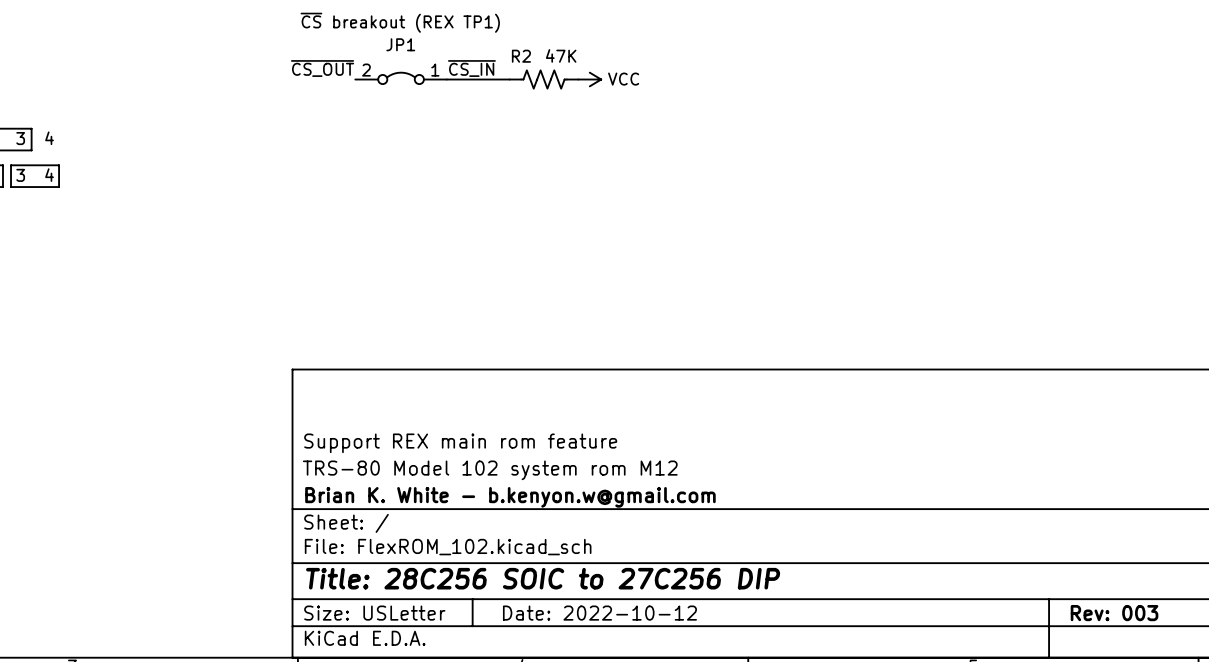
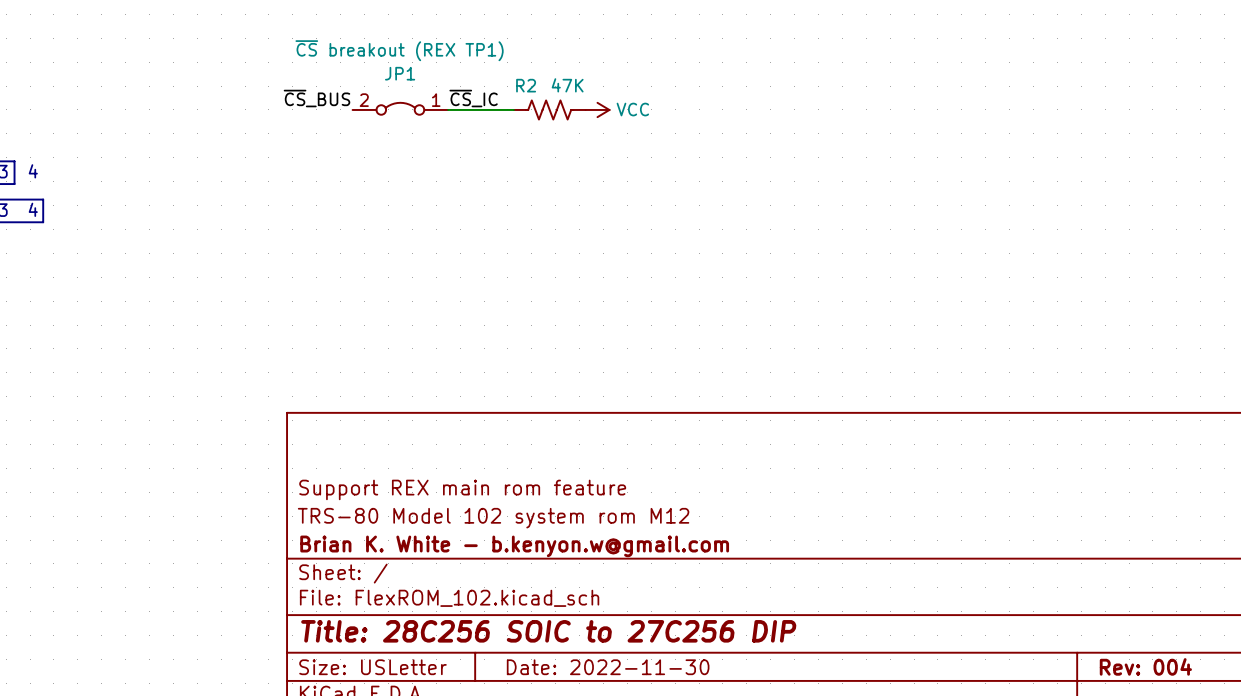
label: ~{CS_OUT} (322, 68) -> ~{CS}_BUS (316, 98)
label: ~{CS_IN} (471, 68) -> ~{CS}_IC (473, 98)
title block: Date: 2022-10-12 (599, 613) -> Date: 2022-11-30 (608, 667)
title block: Rev: 003 (1114, 613) -> Rev: 004 (1145, 666)

